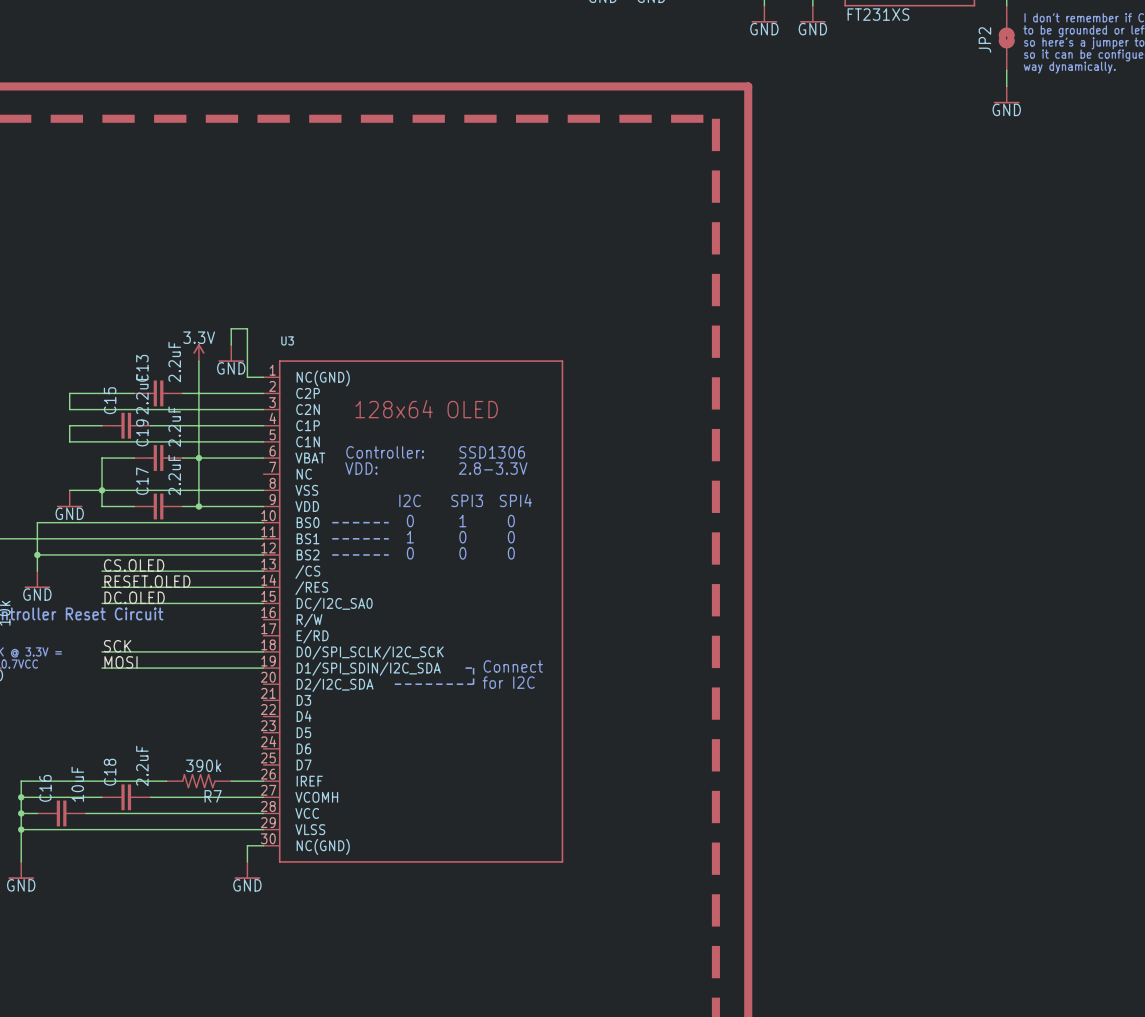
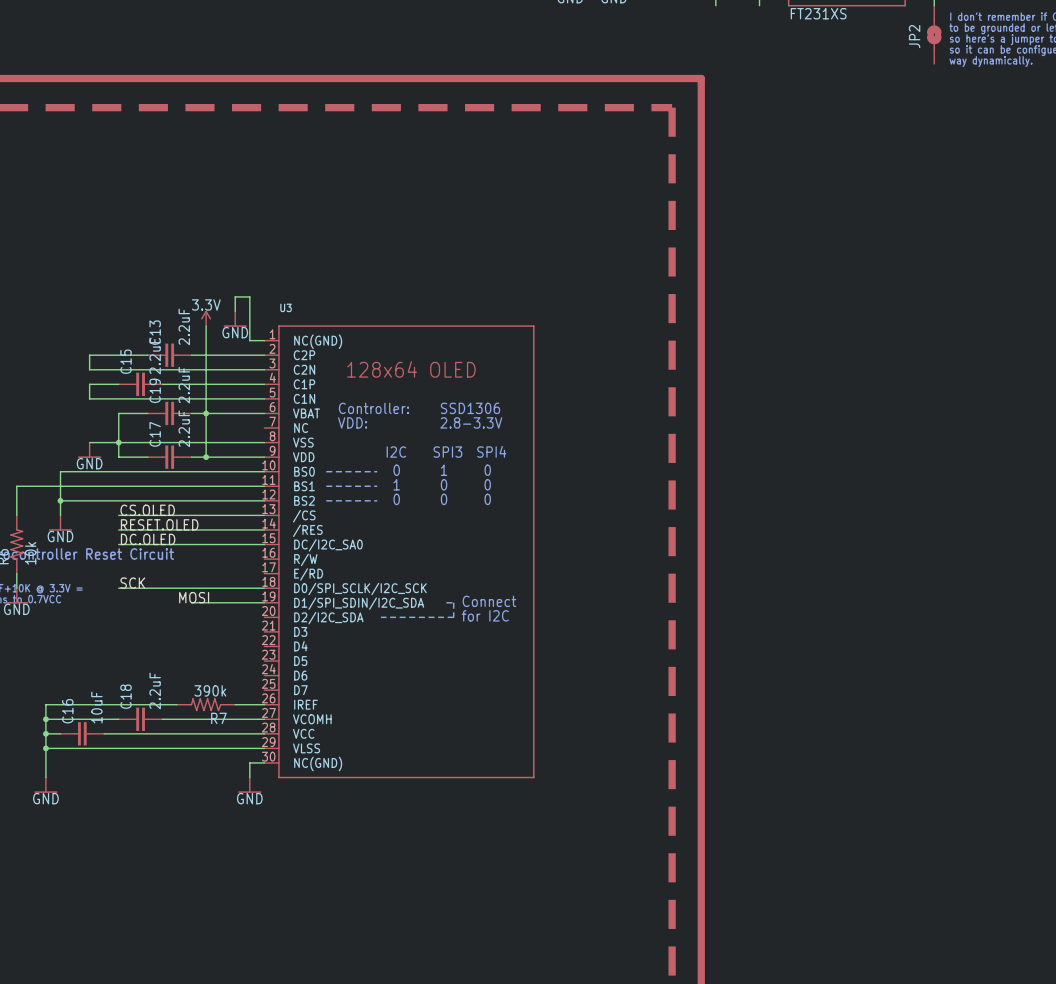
power symbol: GND (764, 14) -> none
power symbol: GND (812, 14) -> none
wire: (1006, 70) (1006, 86) -> none
power symbol: GND (1006, 94) -> none
label position: MOSI (121, 662) -> MOSI (194, 597)
wire: (102, 668) (182, 668) -> none

